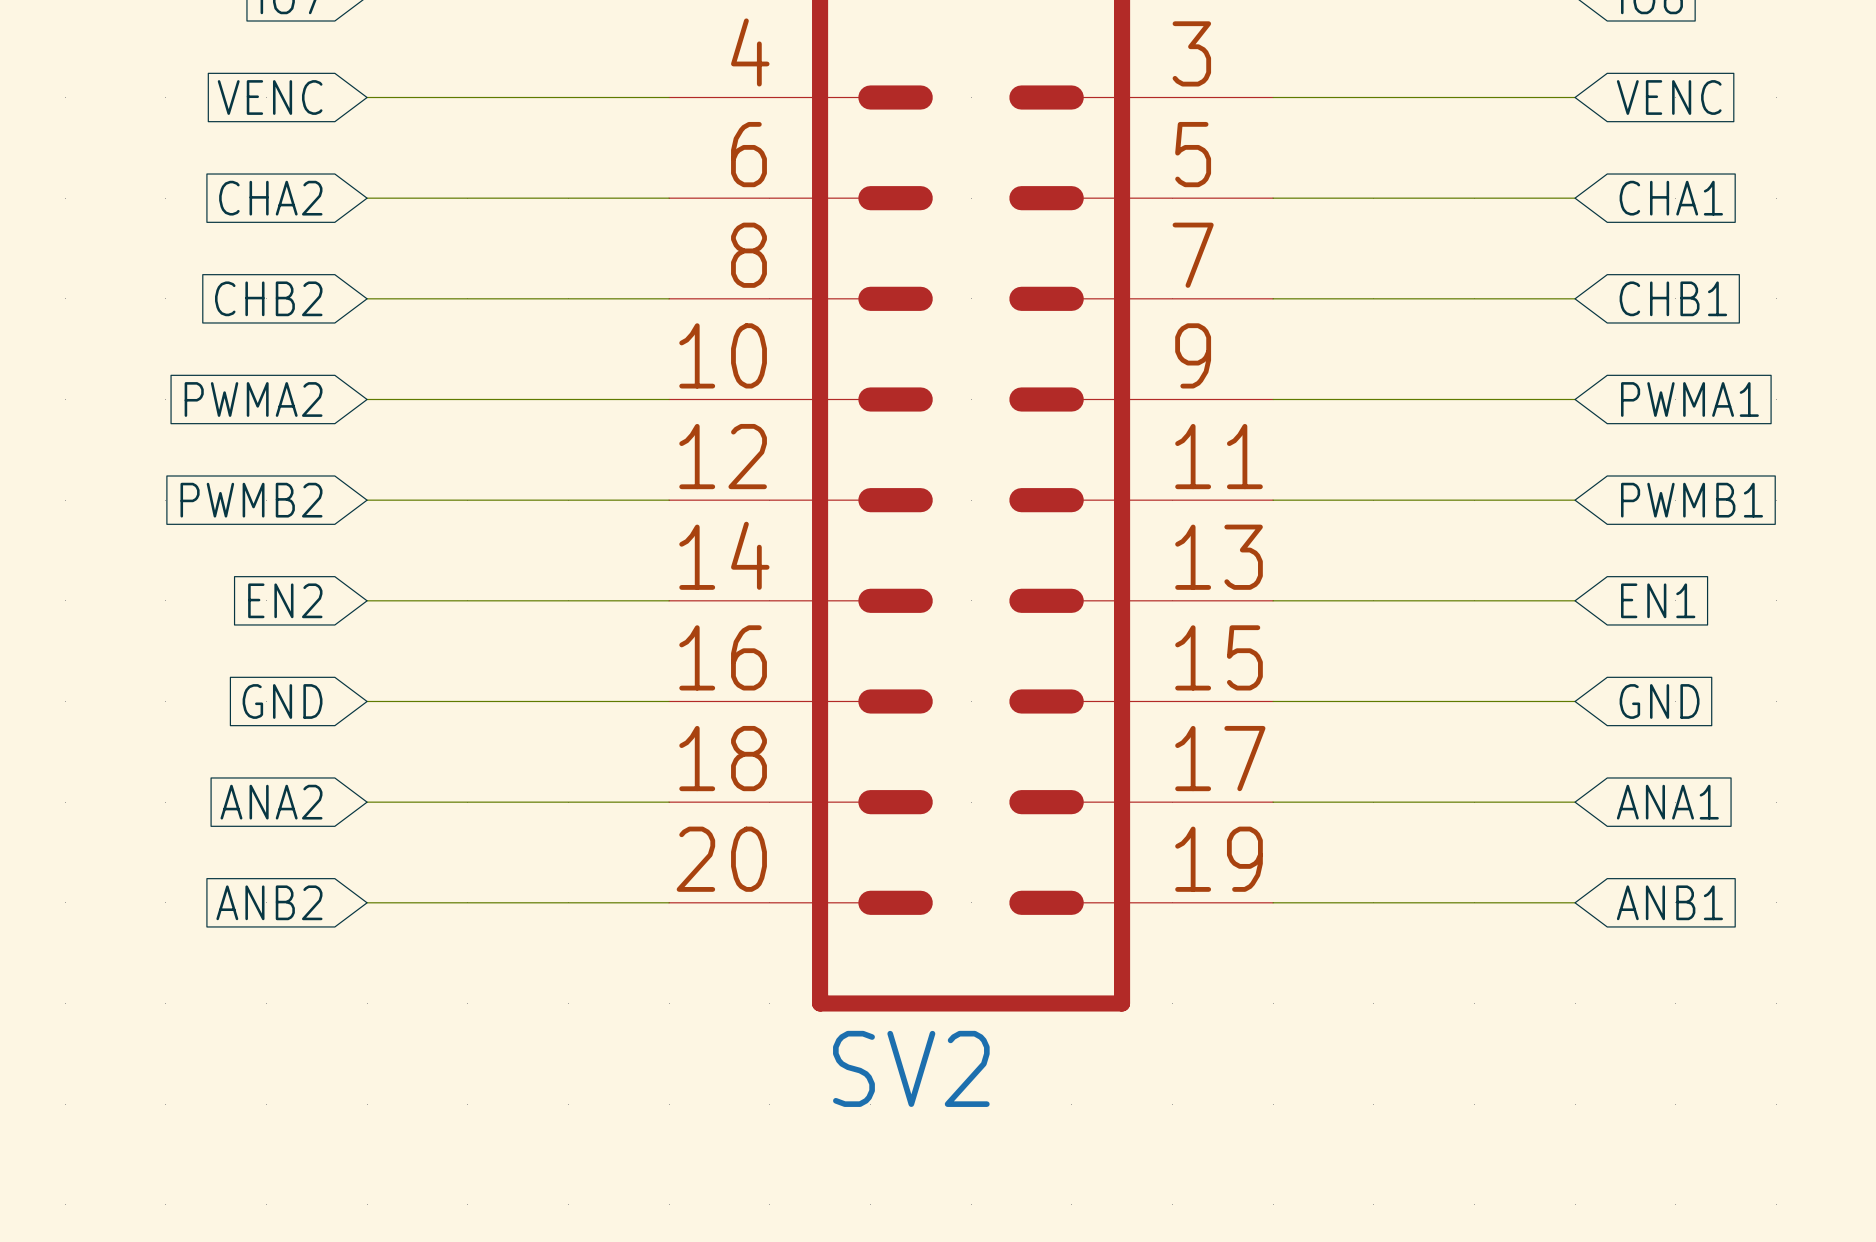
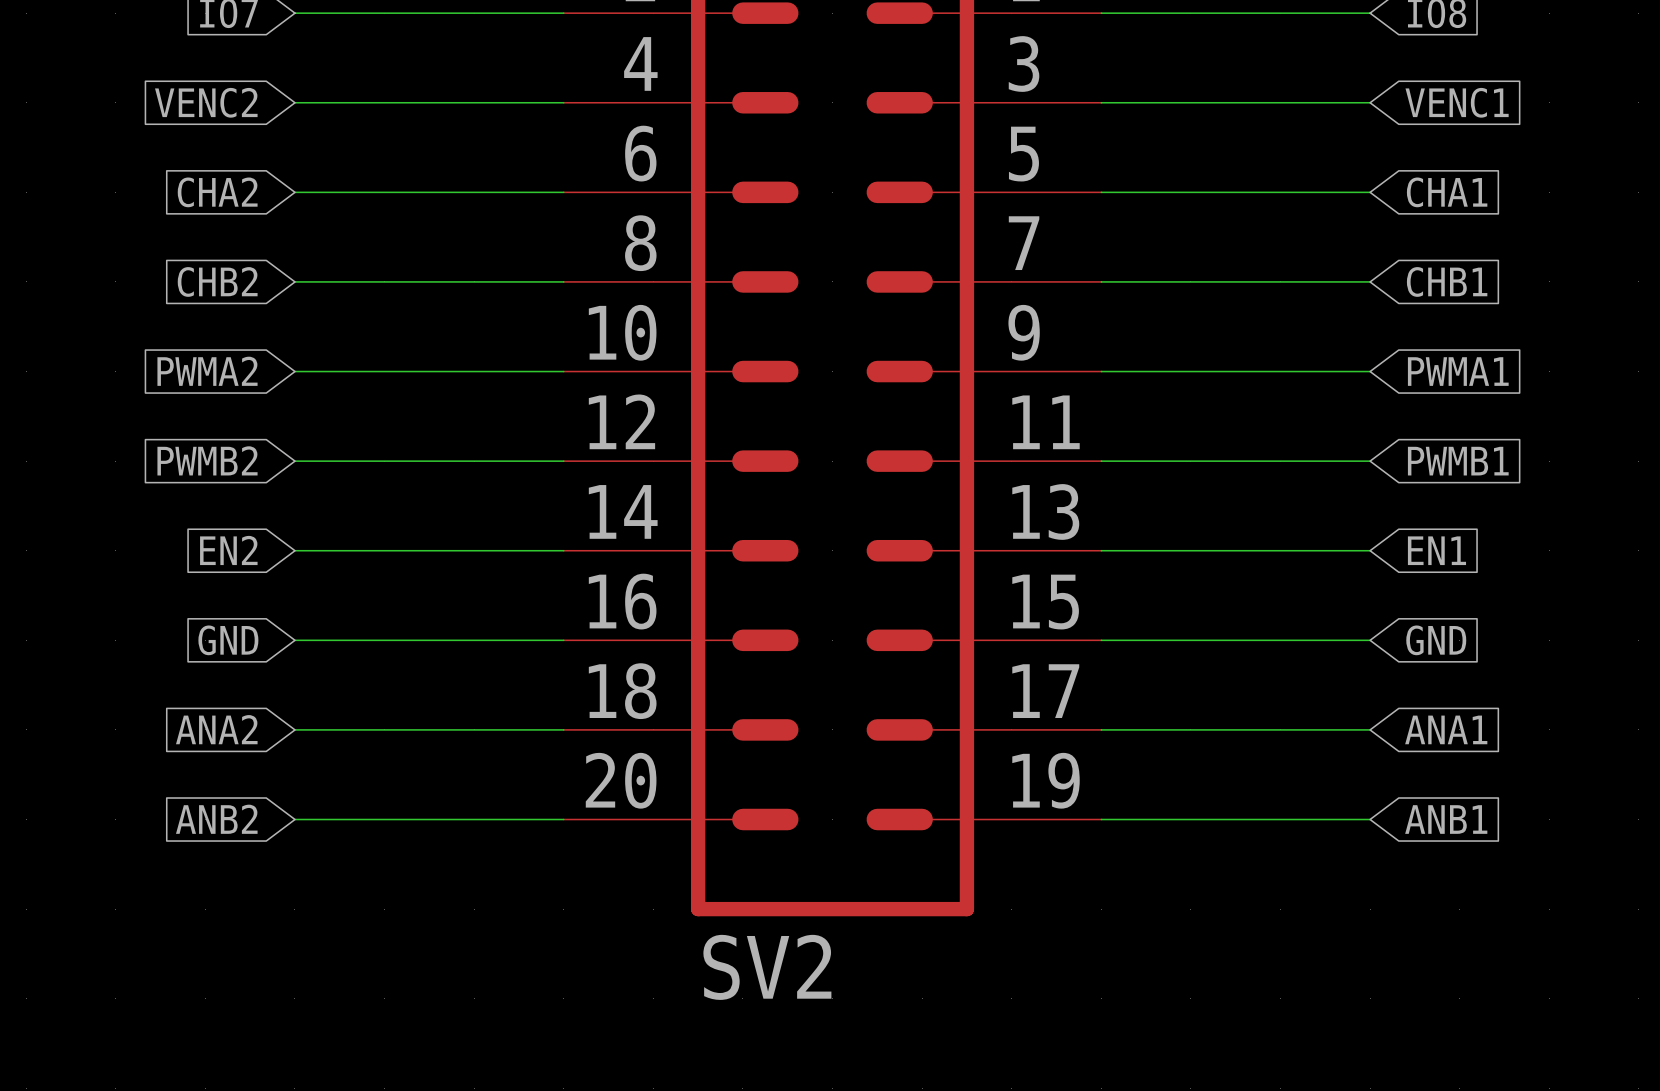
global label: VENC (270, 97) -> VENC2 (206, 102)
global label: VENC (1669, 97) -> VENC1 (1457, 102)

